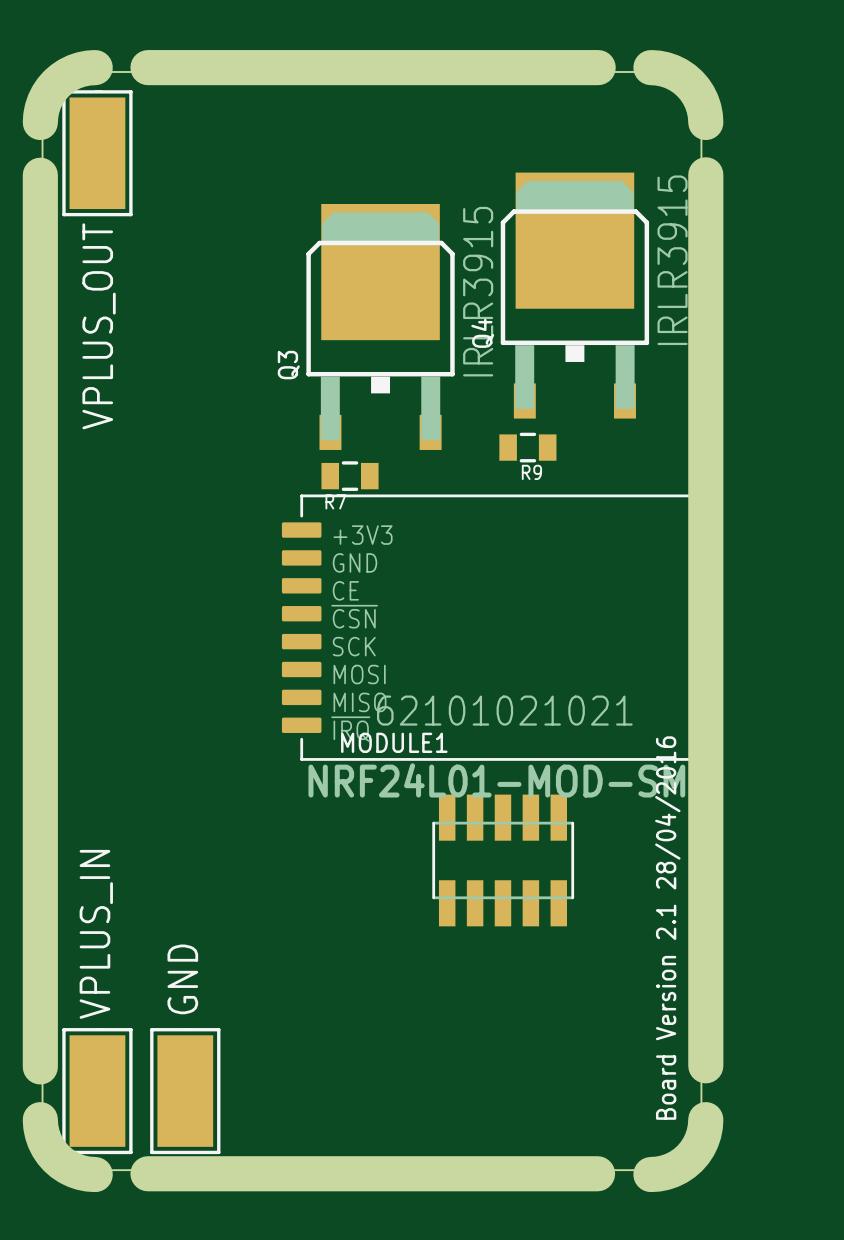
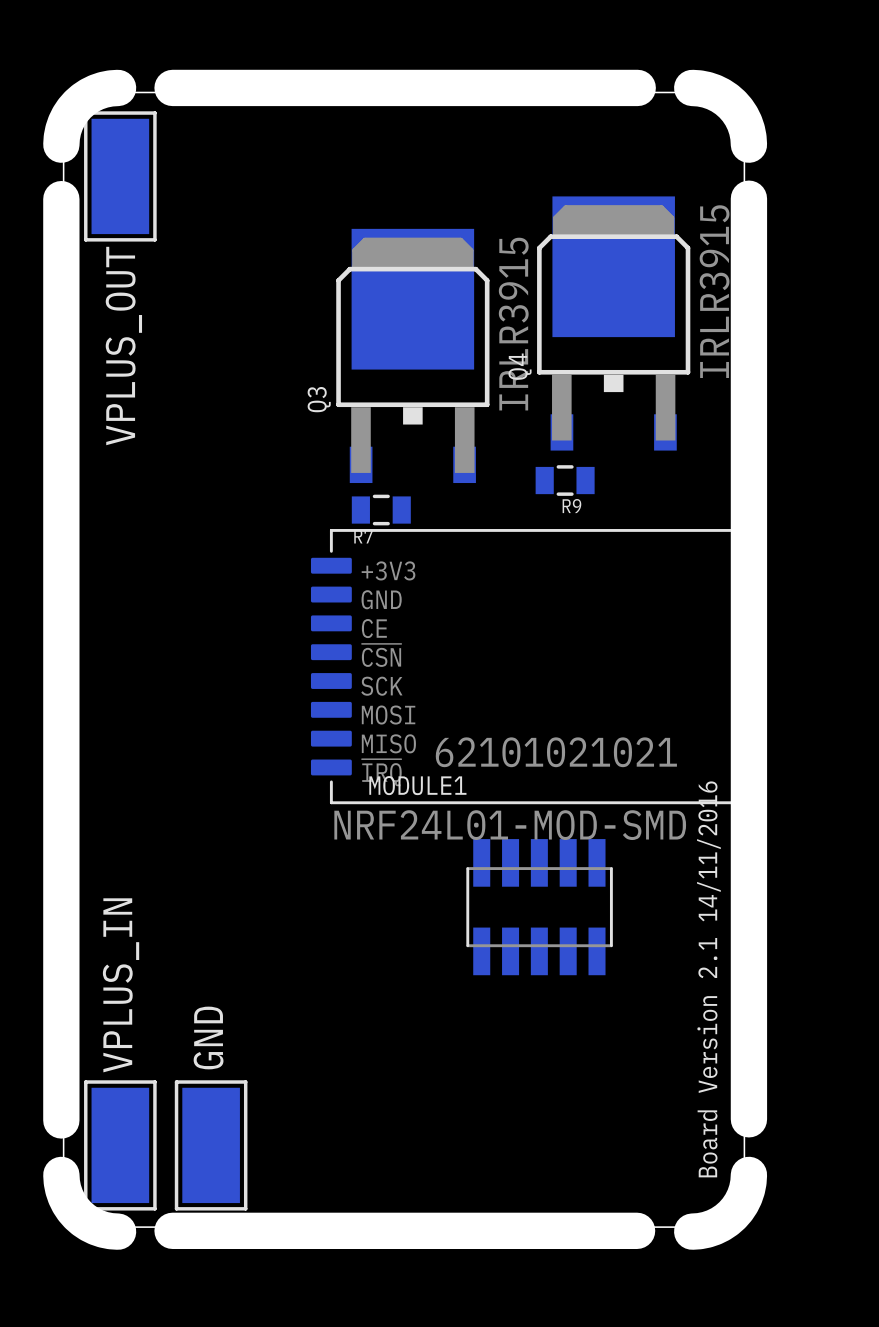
text: Board Version 2.1 28/04/2016 (667, 928) -> Board Version 2.1 14/11/2016 (708, 979)

